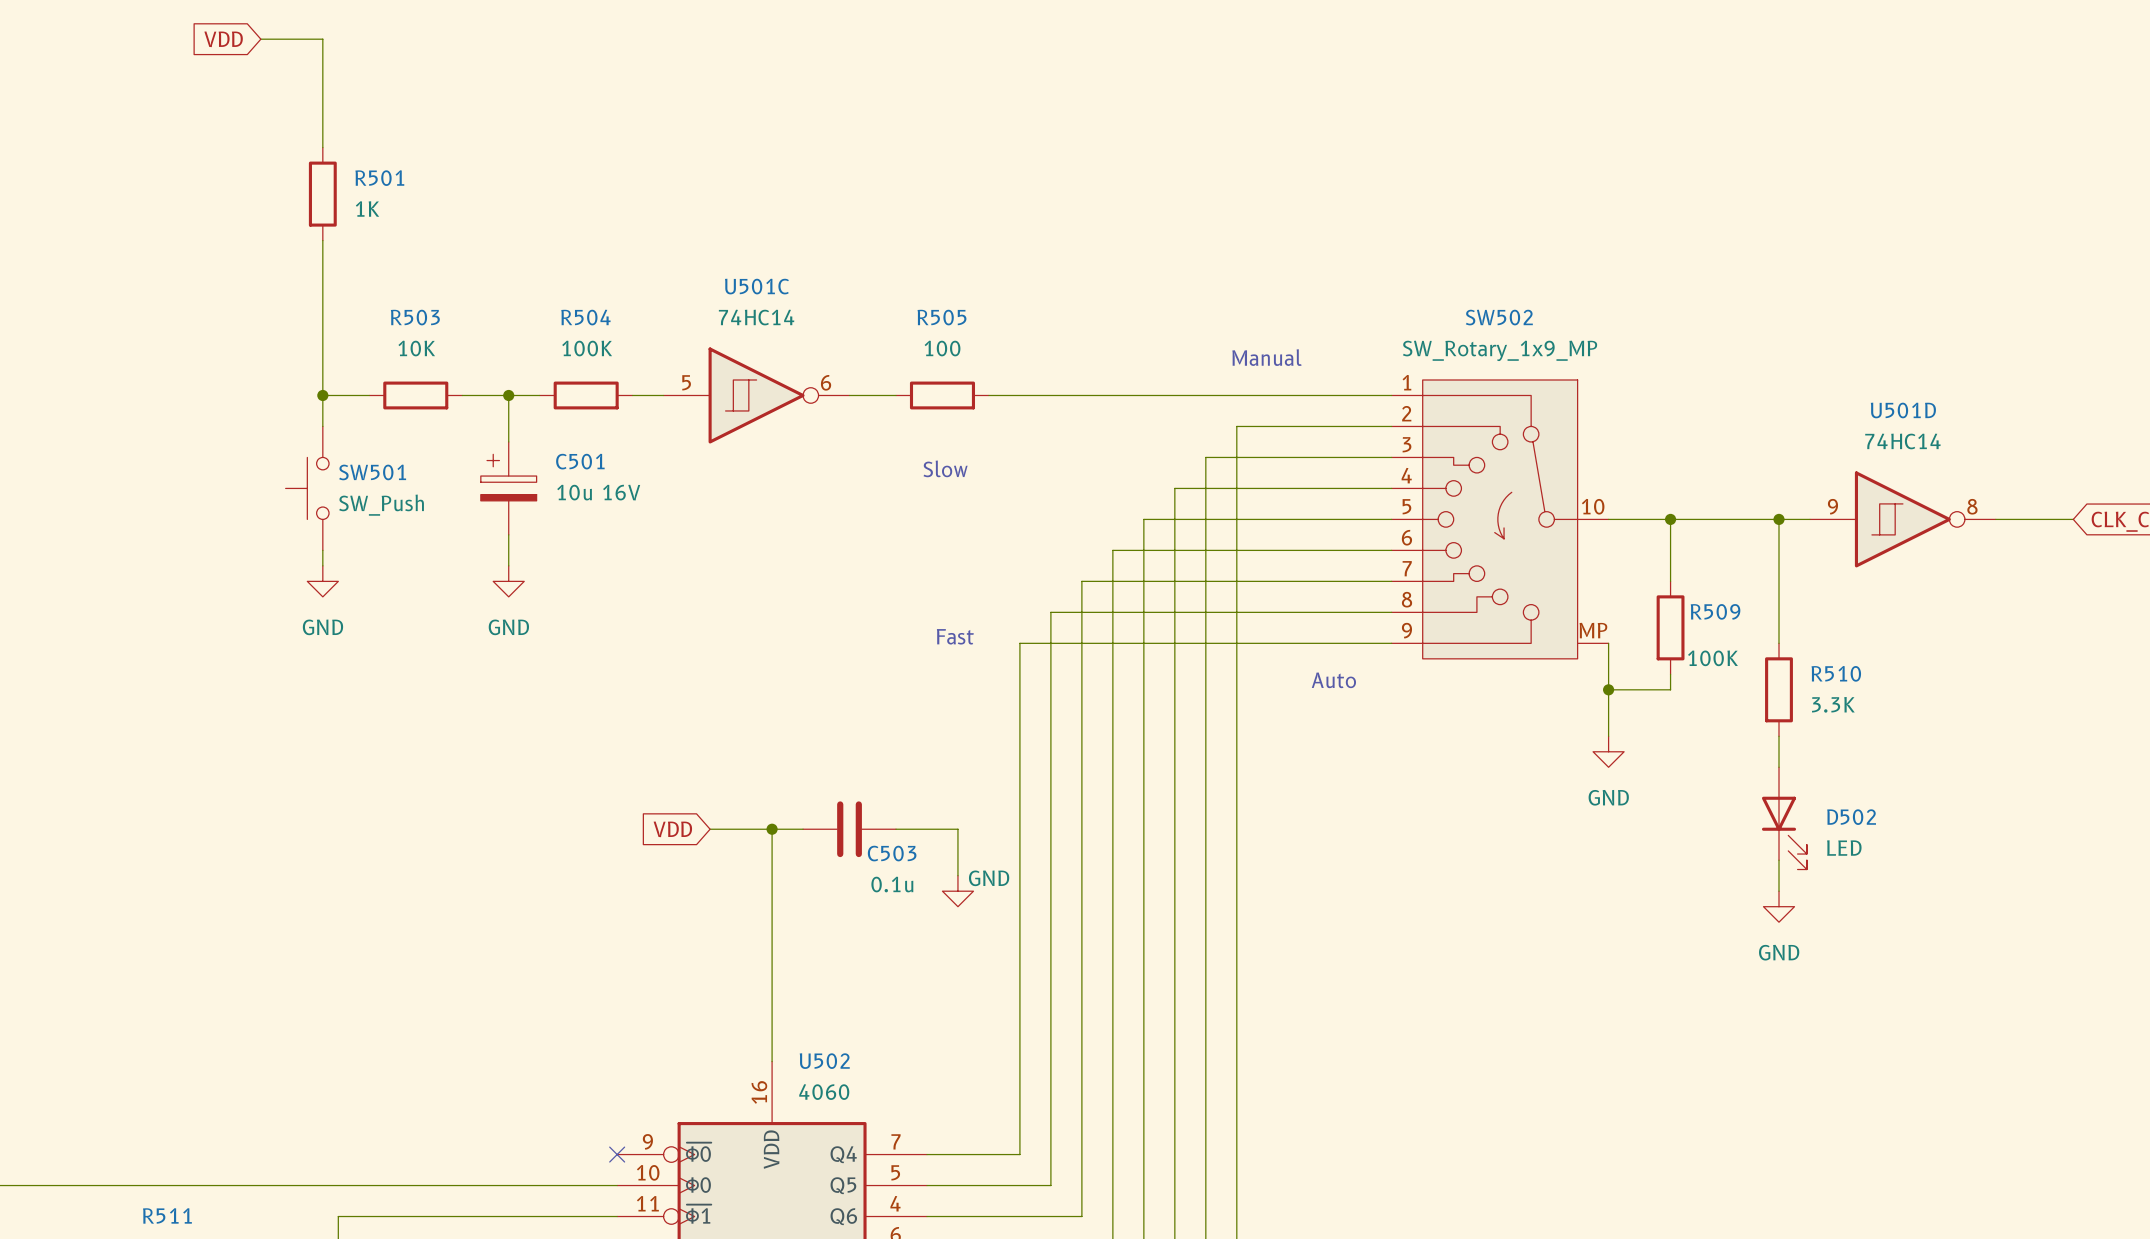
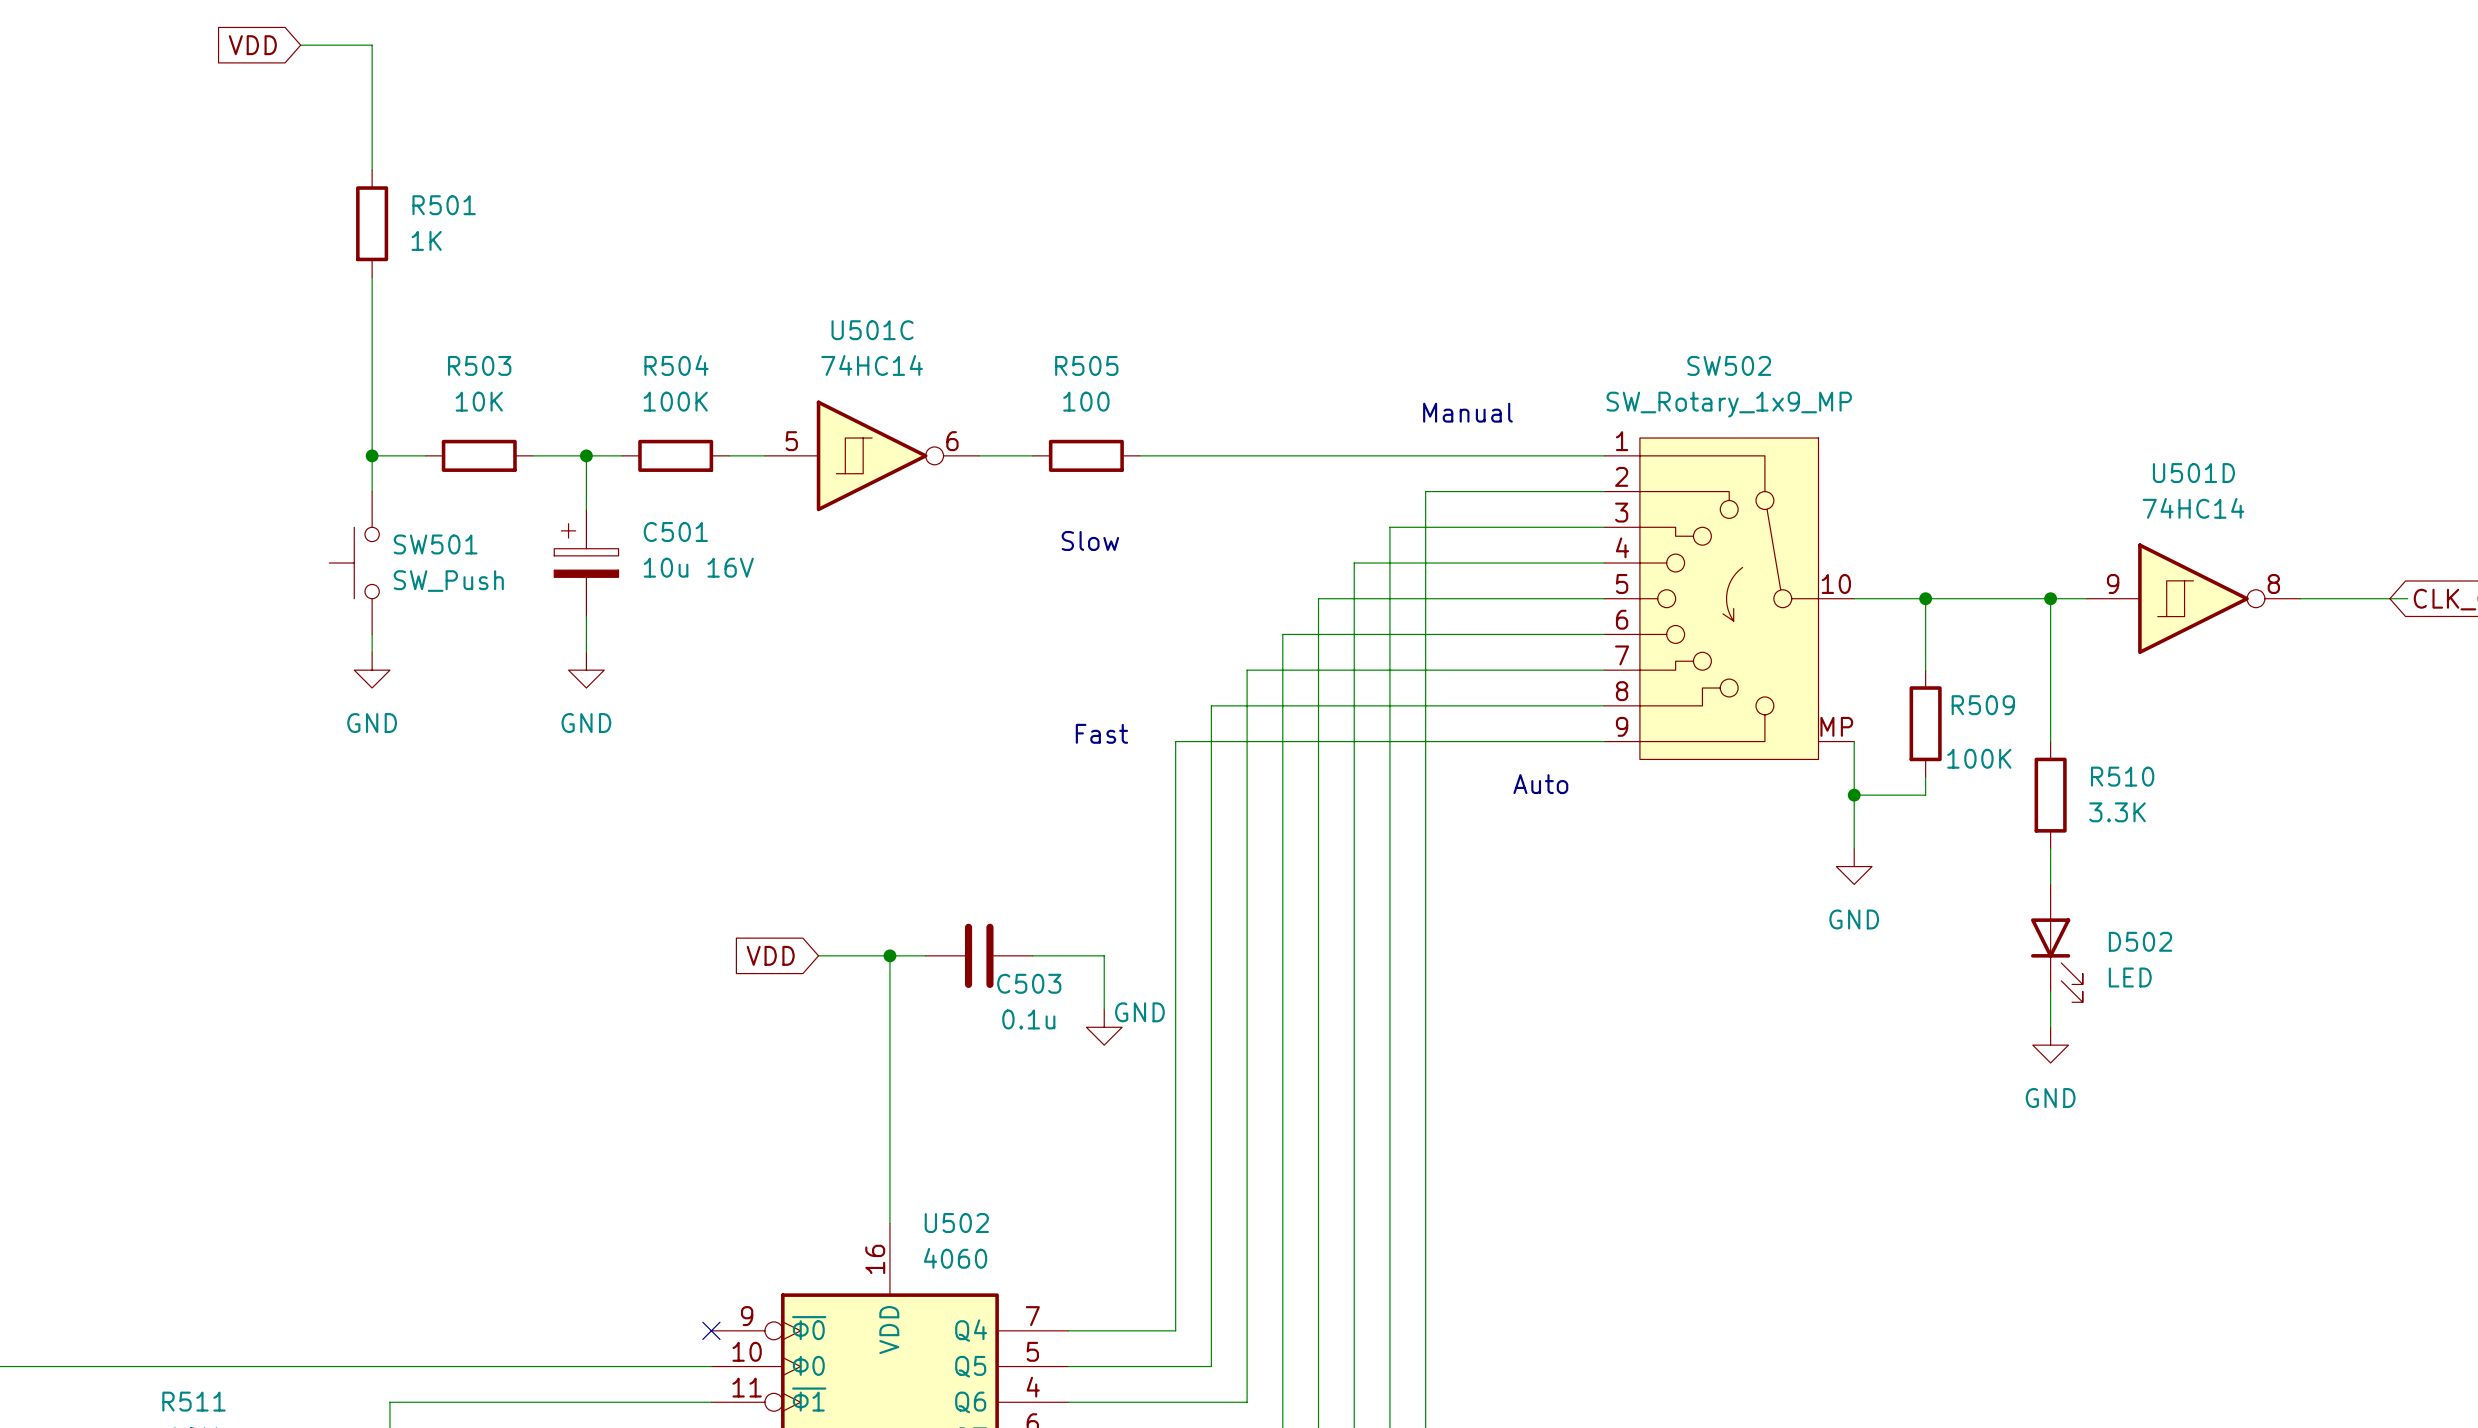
wire: none -> (2389, 598) (2407, 598)

